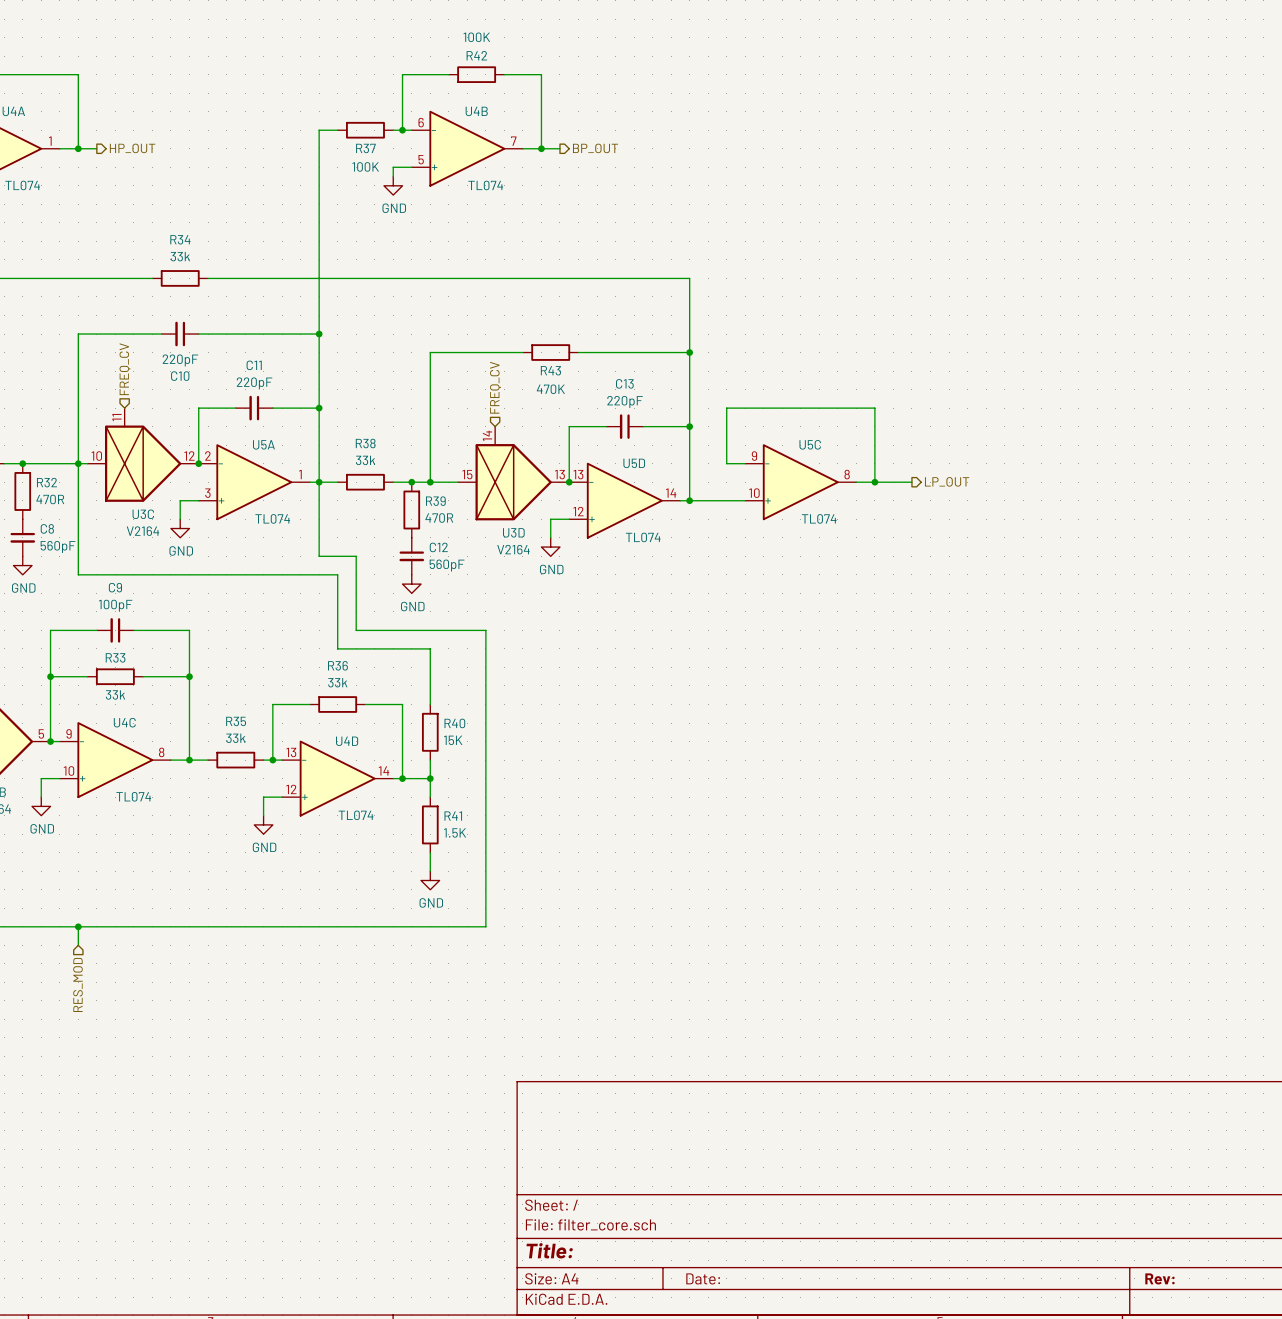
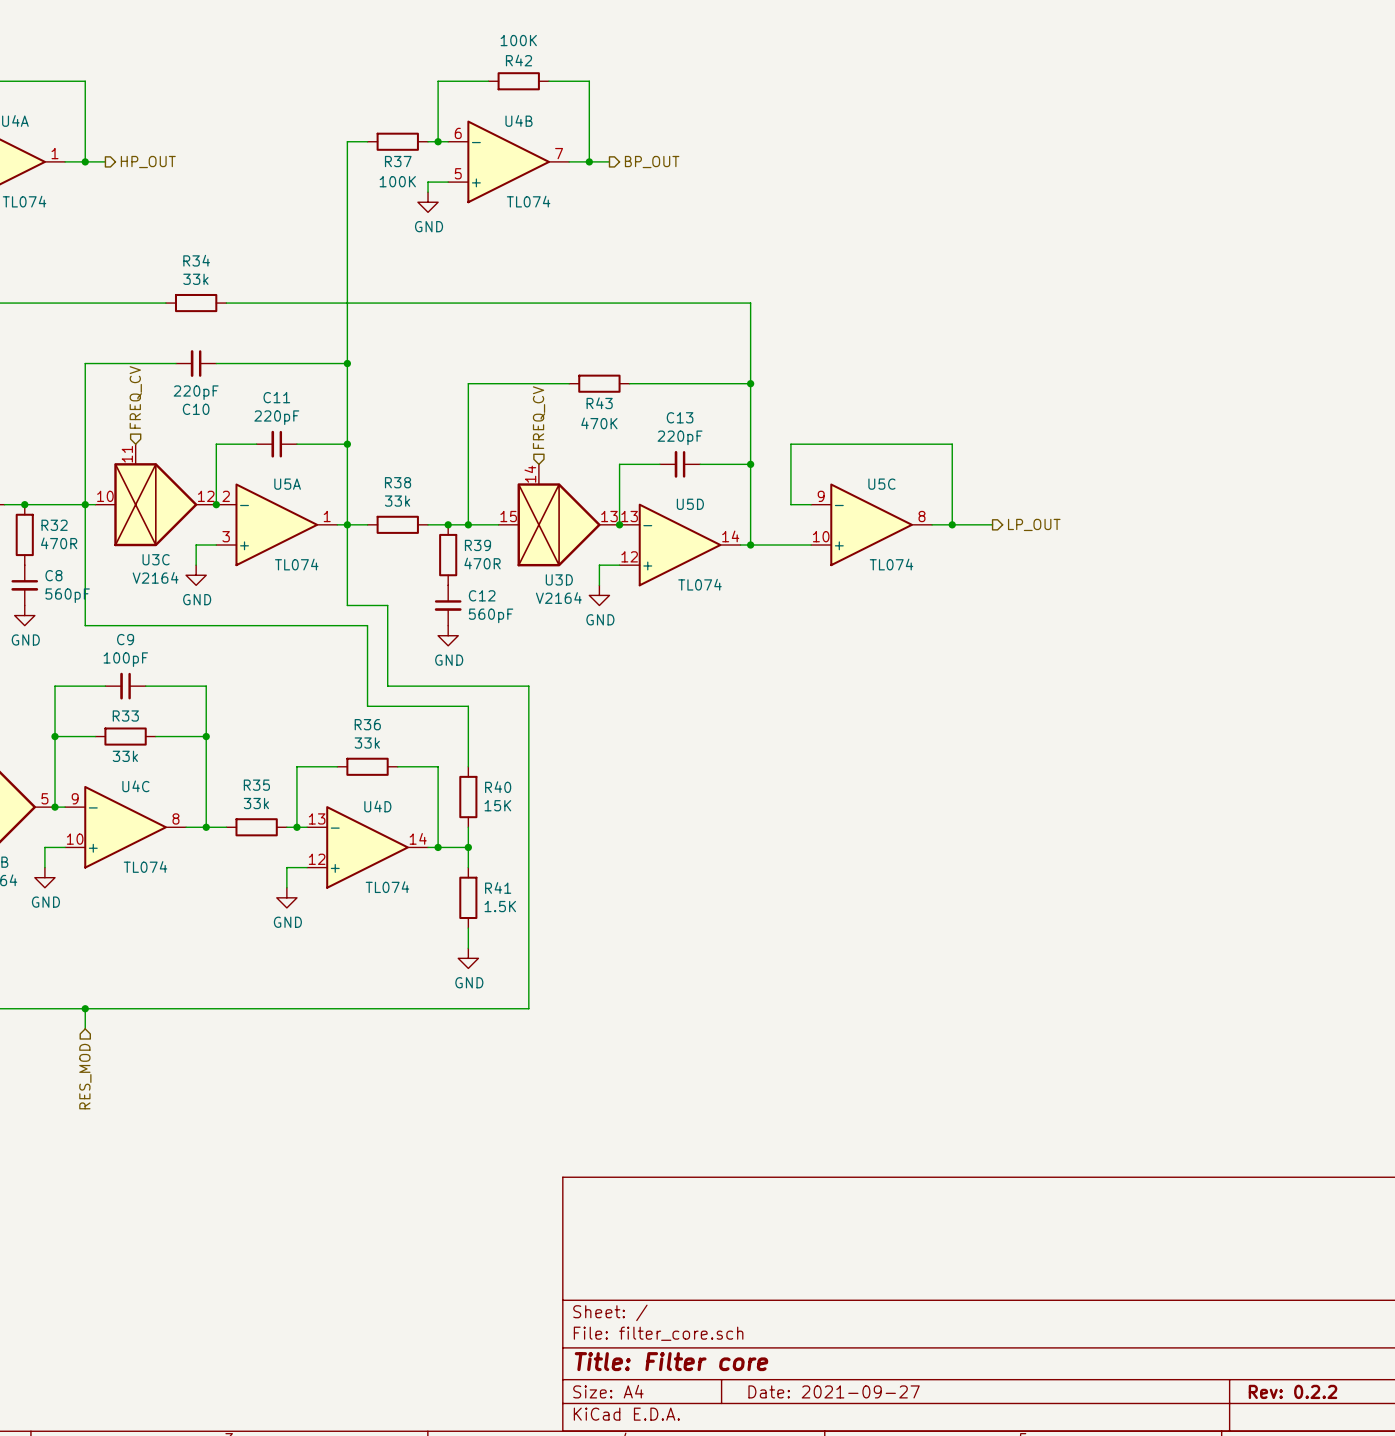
title block: Title: (549, 1250) -> Title: Filter core (671, 1361)
title block: Date: (703, 1278) -> Date: 2021-09-27 (834, 1391)
title block: Rev: (1159, 1278) -> Rev: 0.2.2 (1292, 1391)

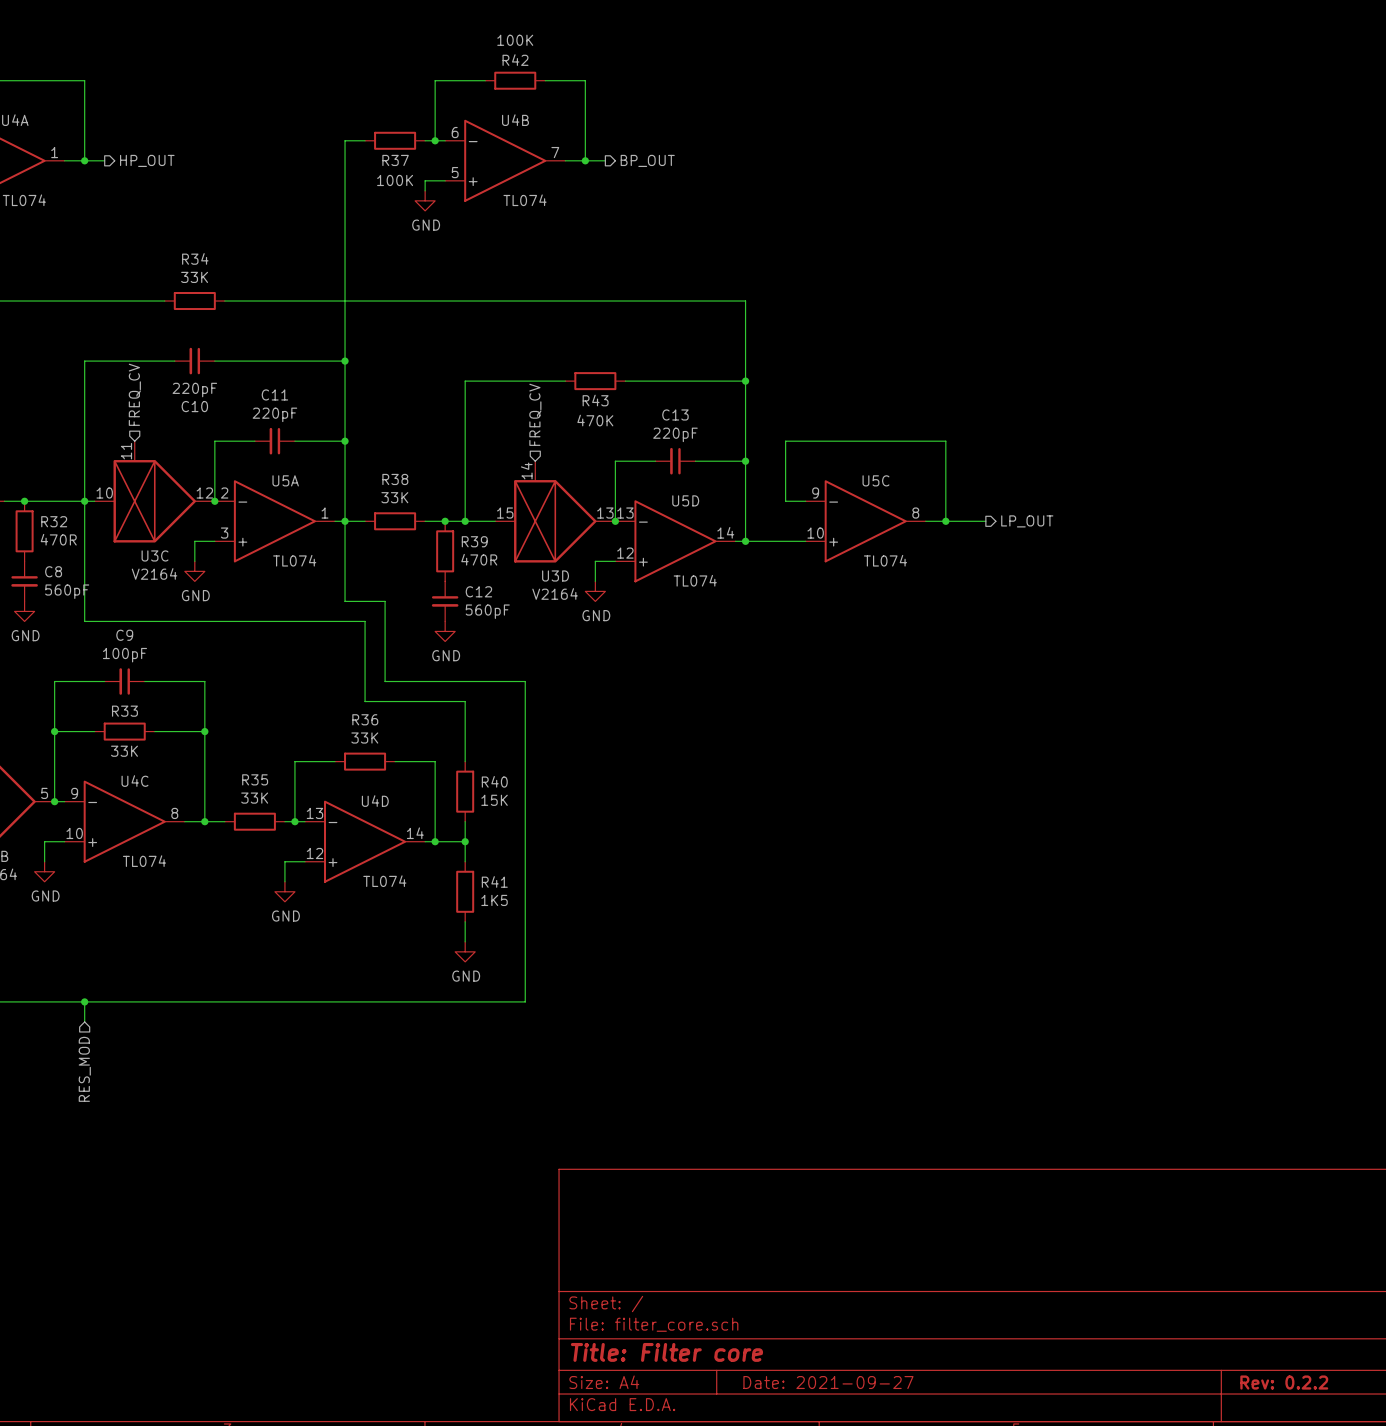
R34 value: 33k (195, 279) -> 33K (194, 277)
R38 value: 33k (397, 501) -> 33K (394, 497)
R36 value: 33k (367, 743) -> 33K (364, 738)
R33 value: 33k (125, 756) -> 33K (124, 751)
R35 value: 33k (256, 803) -> 33K (254, 798)
R41 value: 1.5K (500, 906) -> 1K5 (494, 900)

